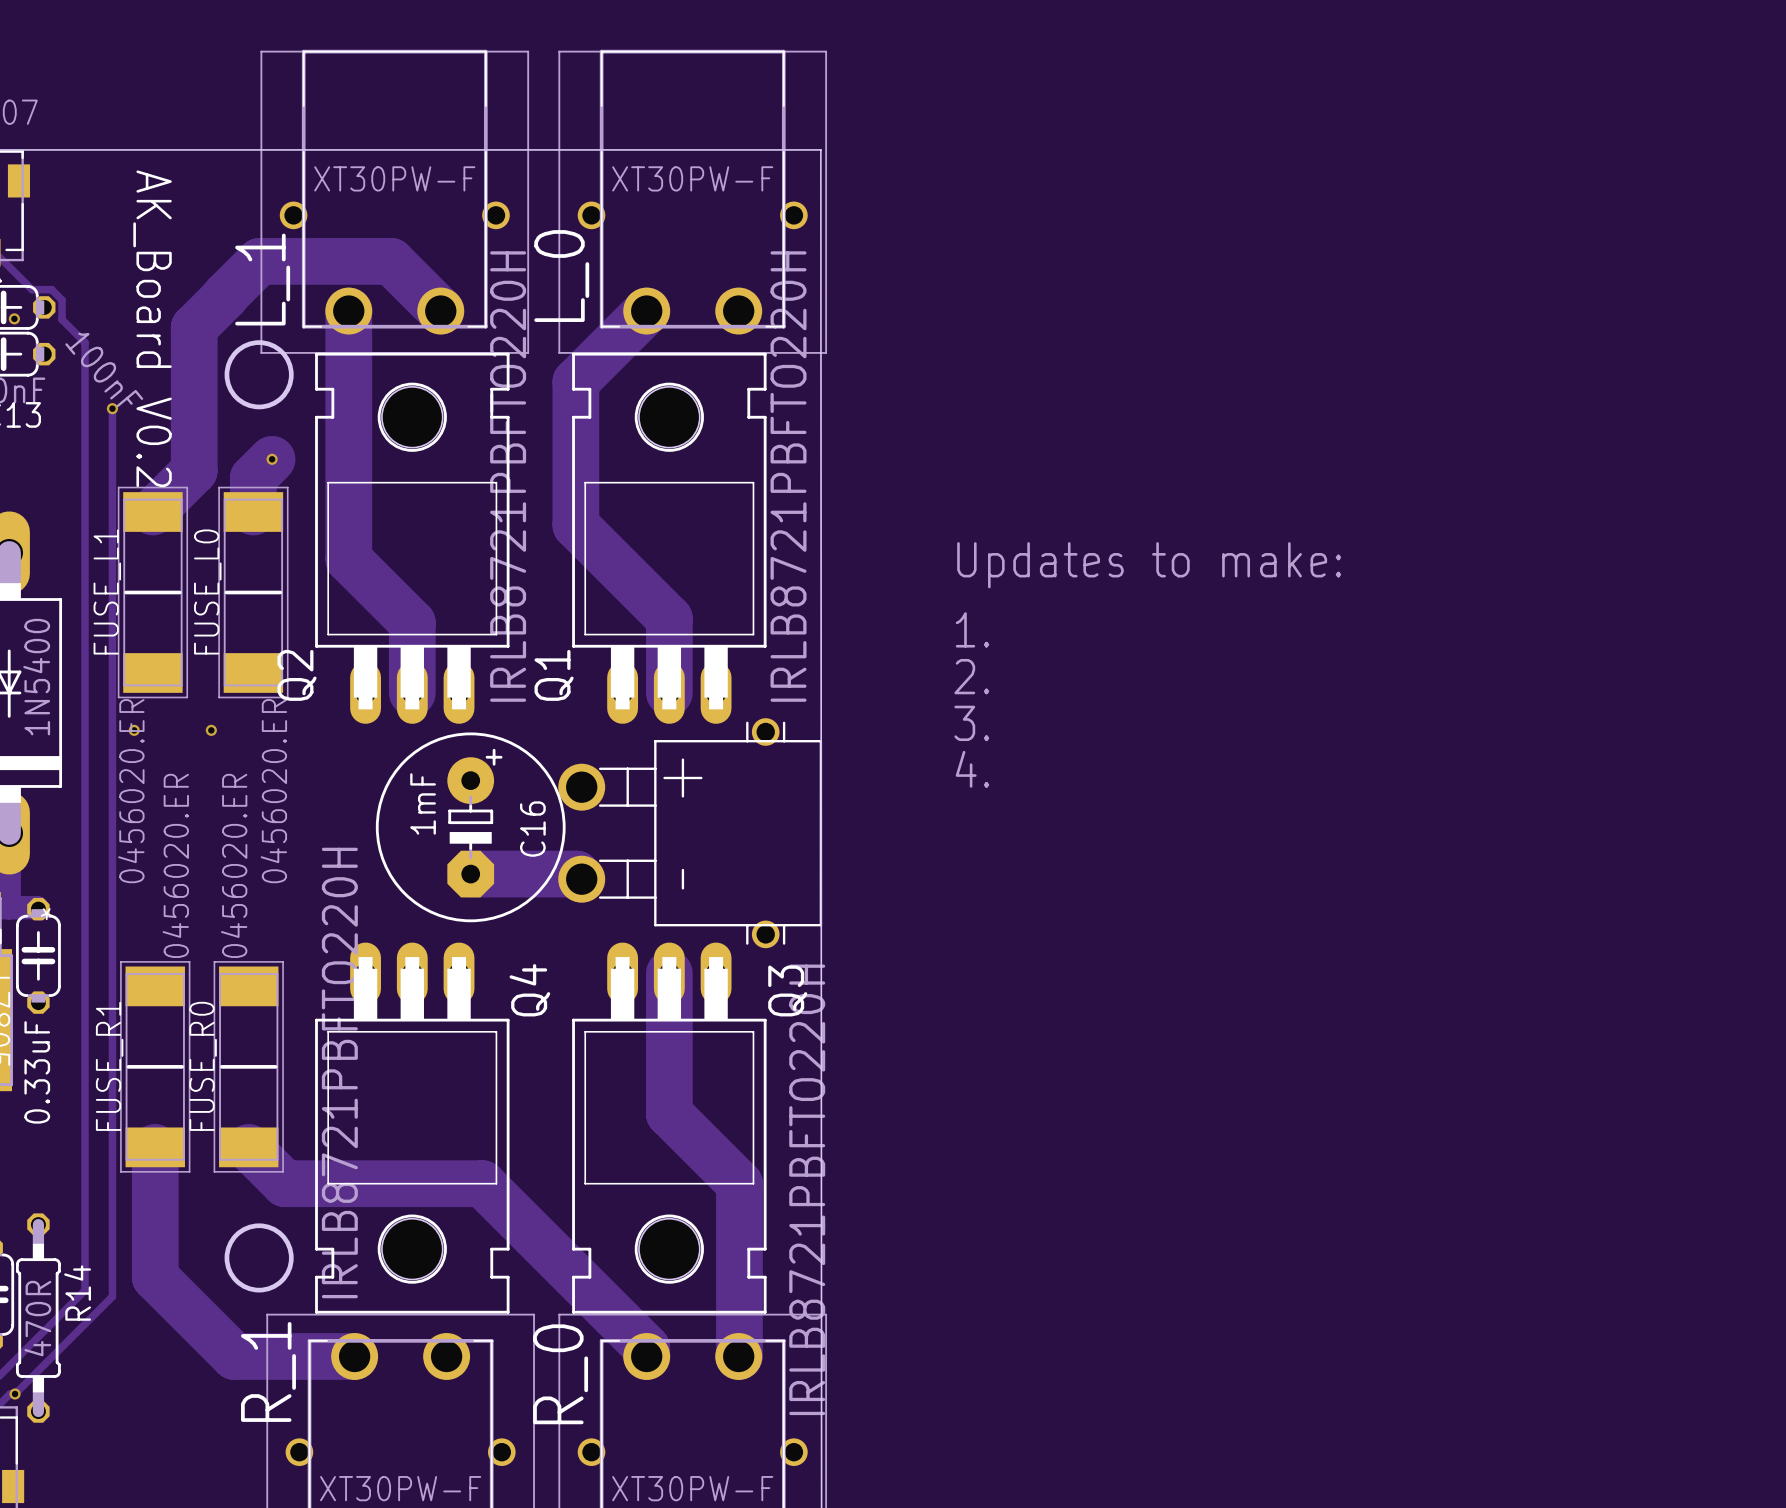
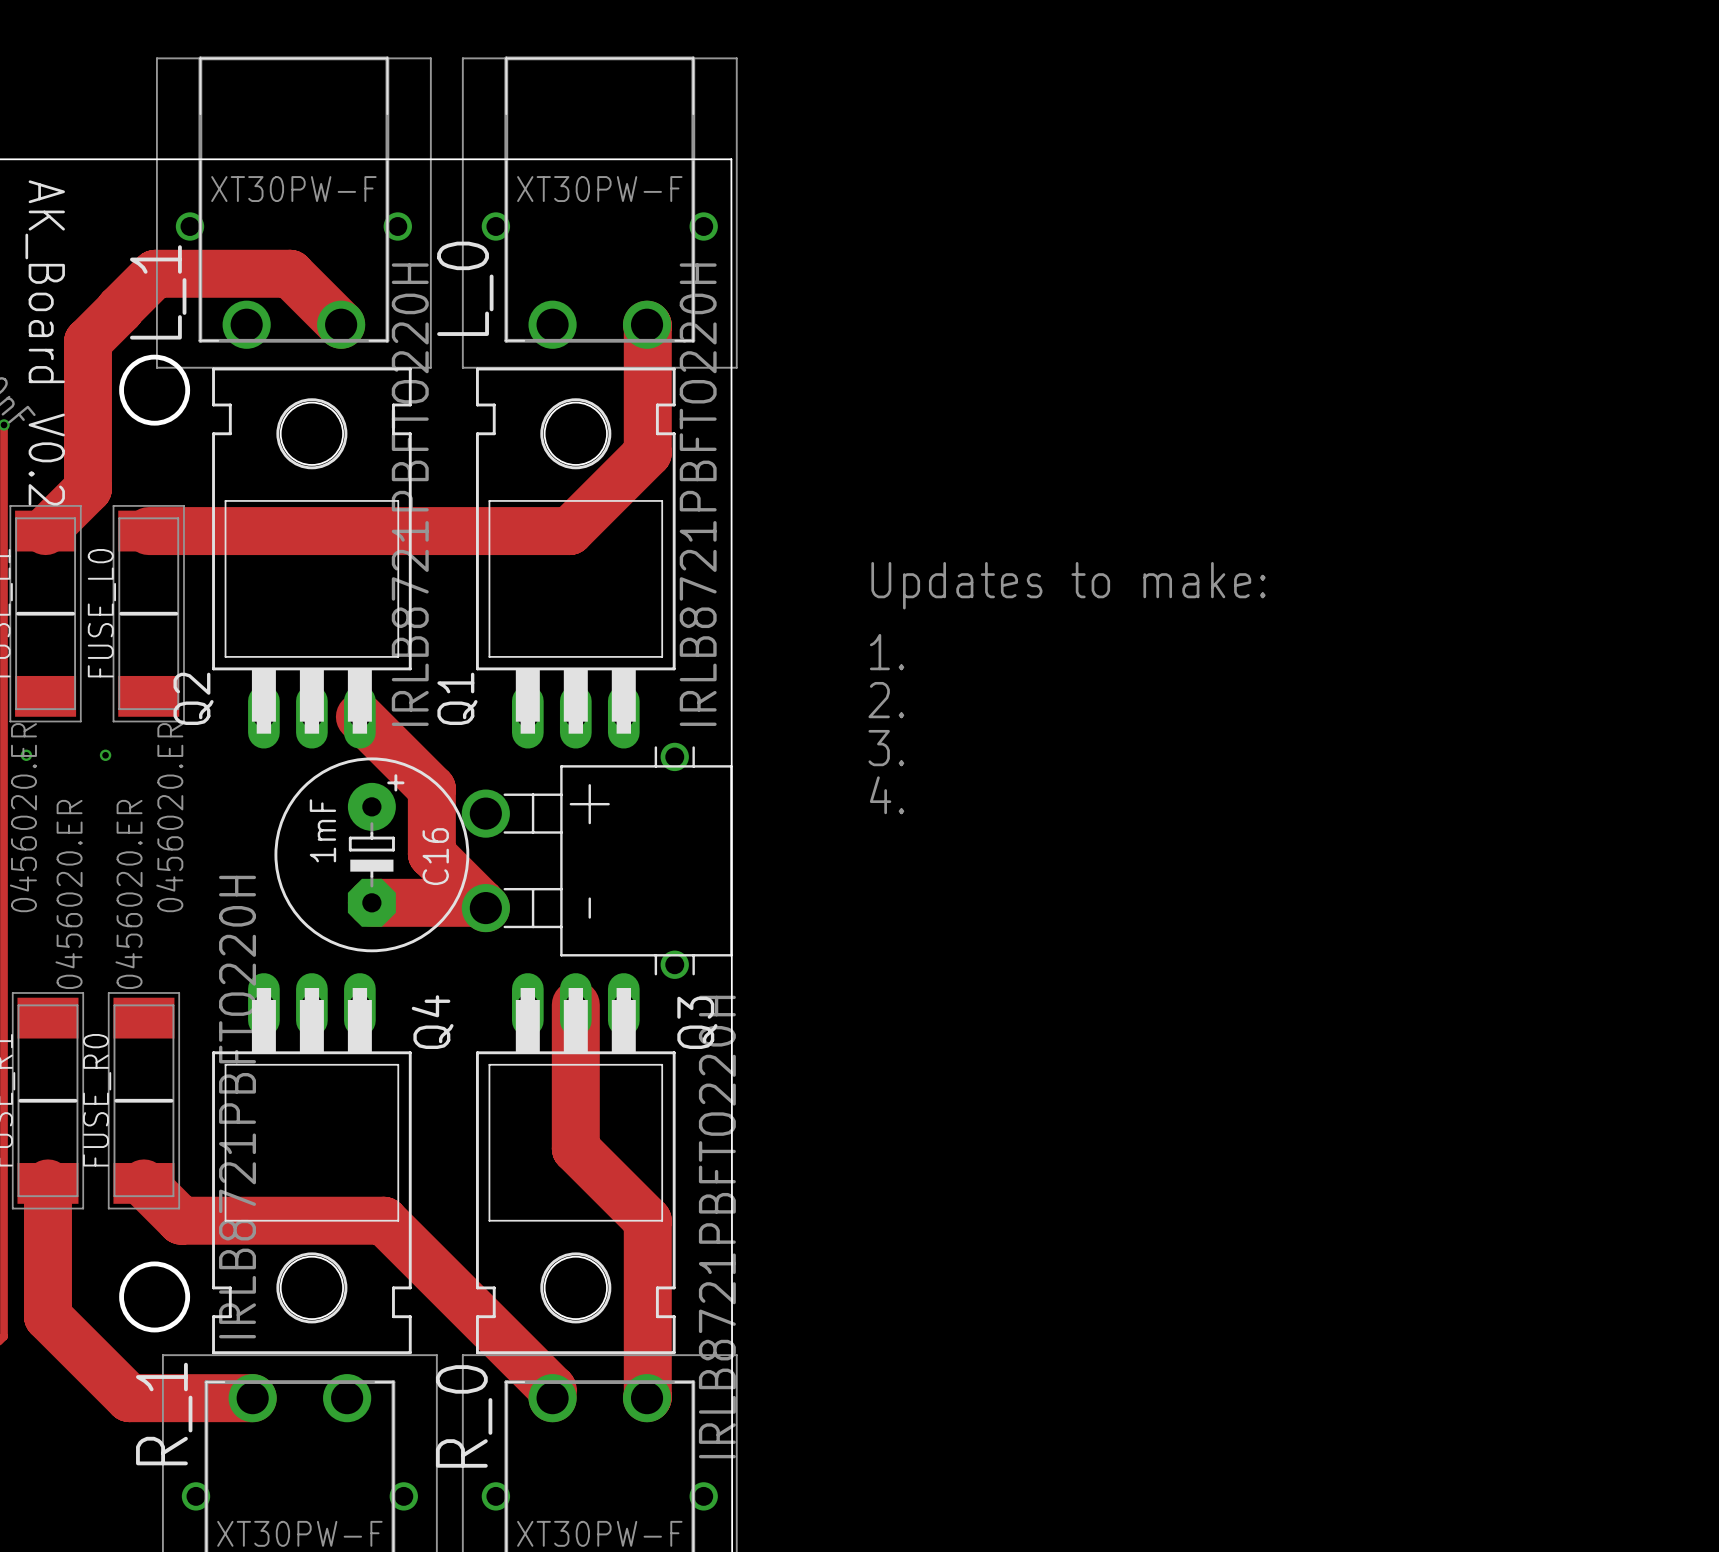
track: (348, 311) (348, 559) (412, 622) (412, 692) -> none
track: (646, 311) (575, 381) (575, 525) (669, 618) (669, 692) -> none
track: (272, 459) (253, 478) (253, 512) -> (647, 324) (647, 452) (569, 531) (148, 531)
via: (272, 459) -> none
track: none -> (359, 716) (431, 788) (431, 854) (480, 902)

